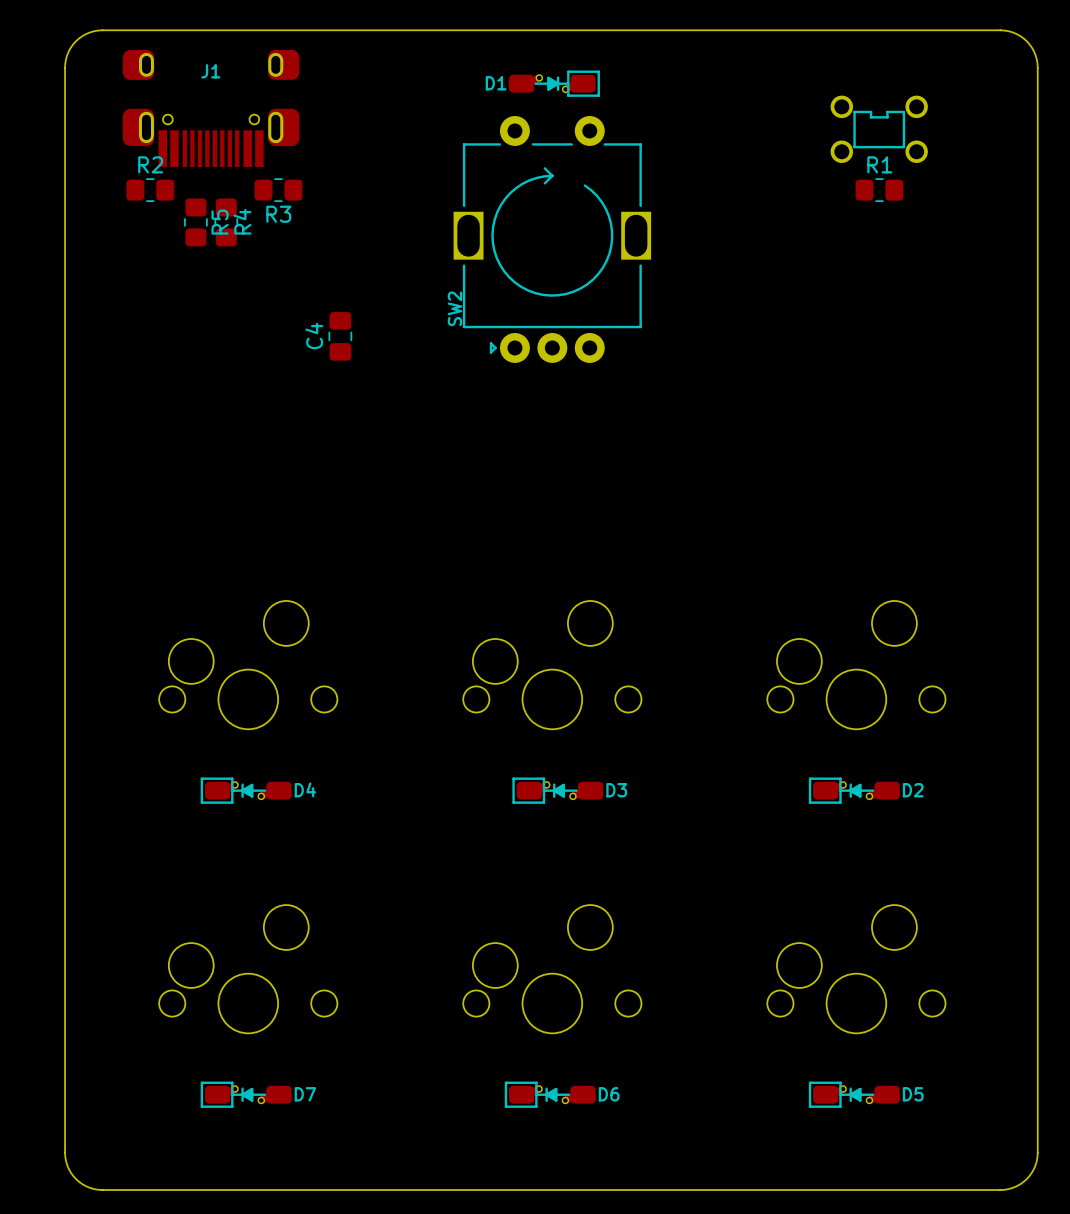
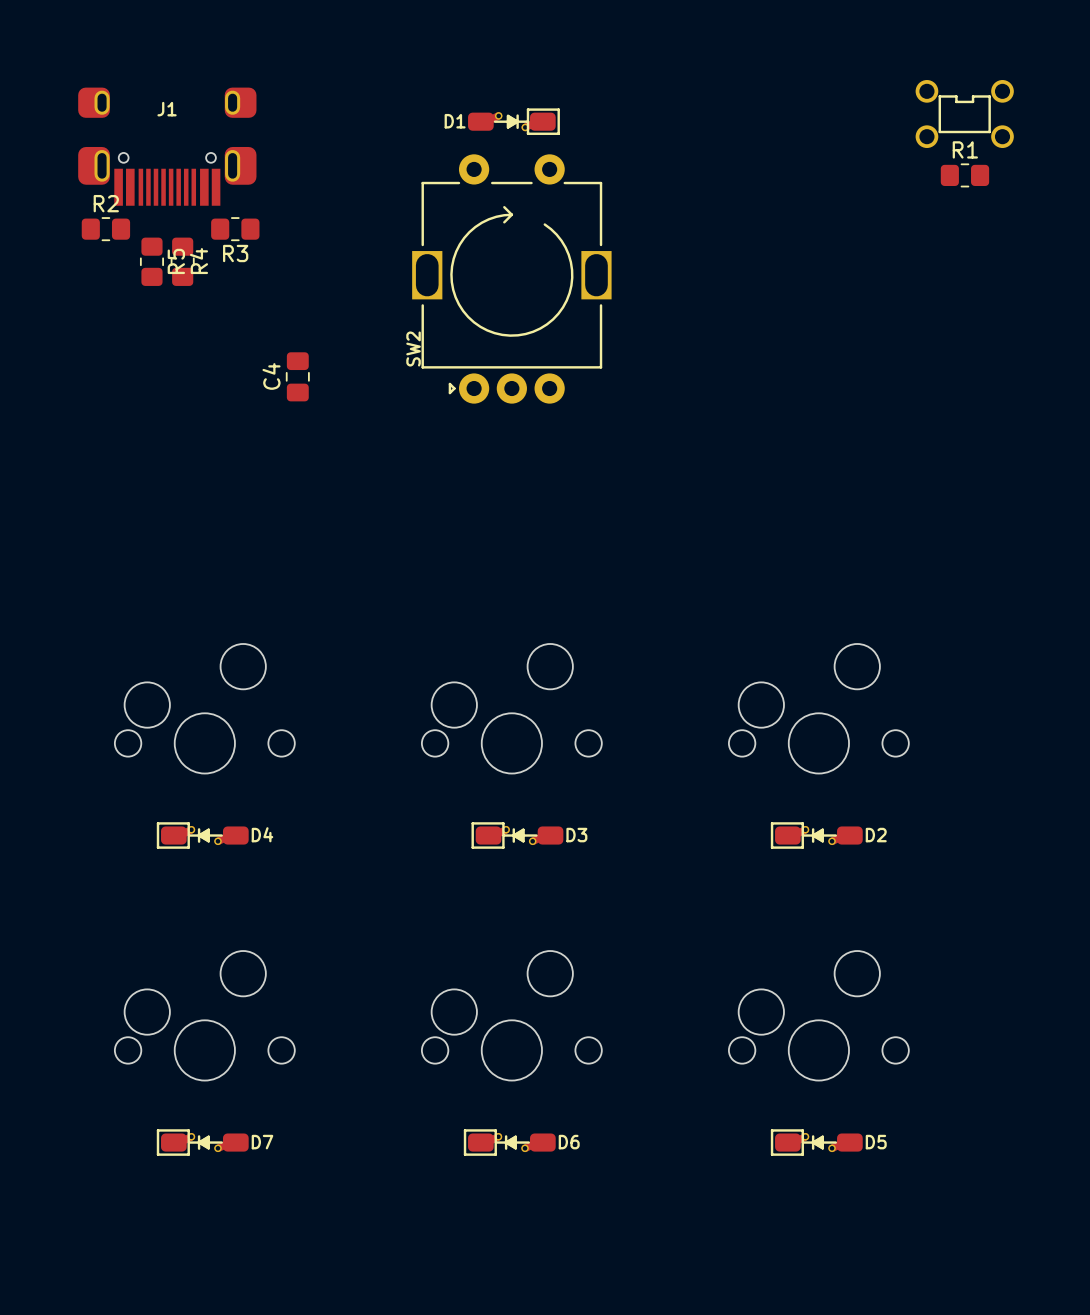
board edge: (102, 30) (1000, 30) (1016, 34) (1029, 44) (1035, 55) (1037, 67) (1037, 1152) (1034, 1168) (1023, 1181) (1012, 1187) (1000, 1190) (102, 1190) (86, 1186) (73, 1175) (67, 1164) (65, 1152) (65, 67) (68, 51) (76, 41) (86, 34) (102, 30) -> none
part position: (879, 129) -> (964, 114)
R1 position: (879, 190) -> (964, 175)

